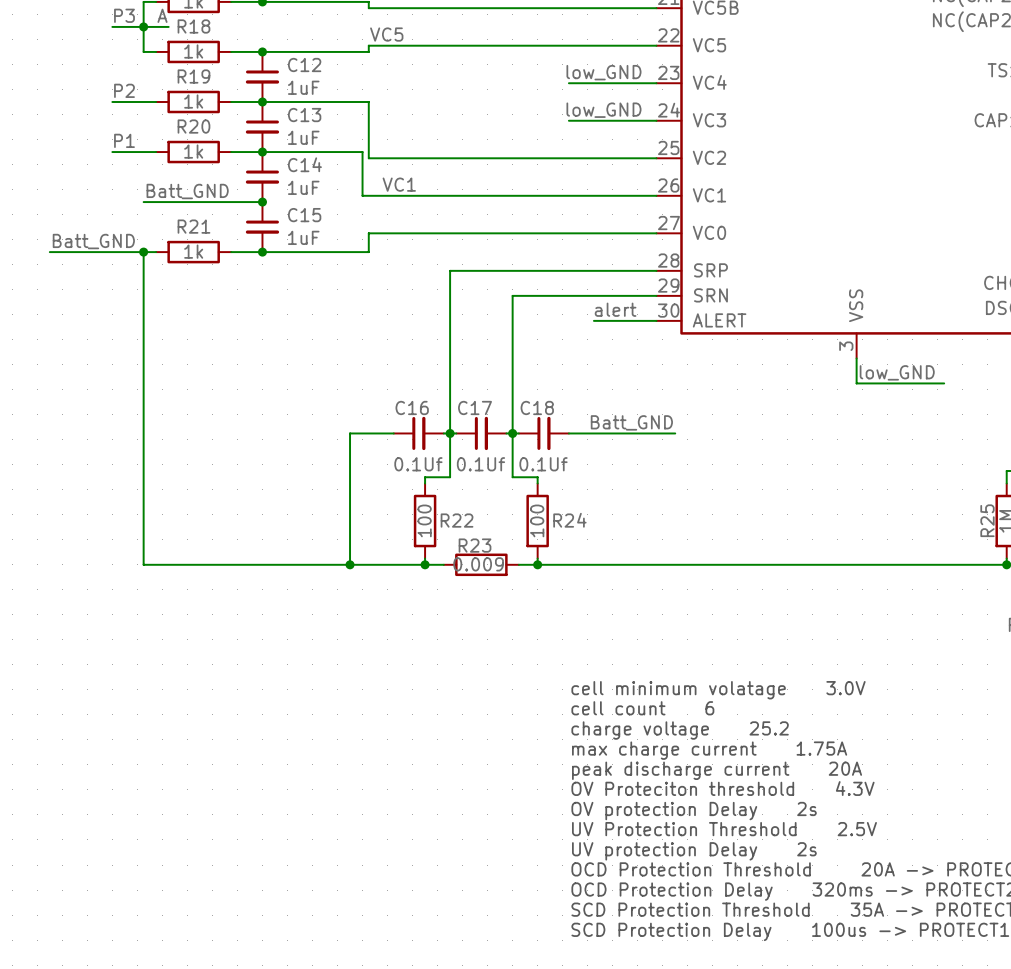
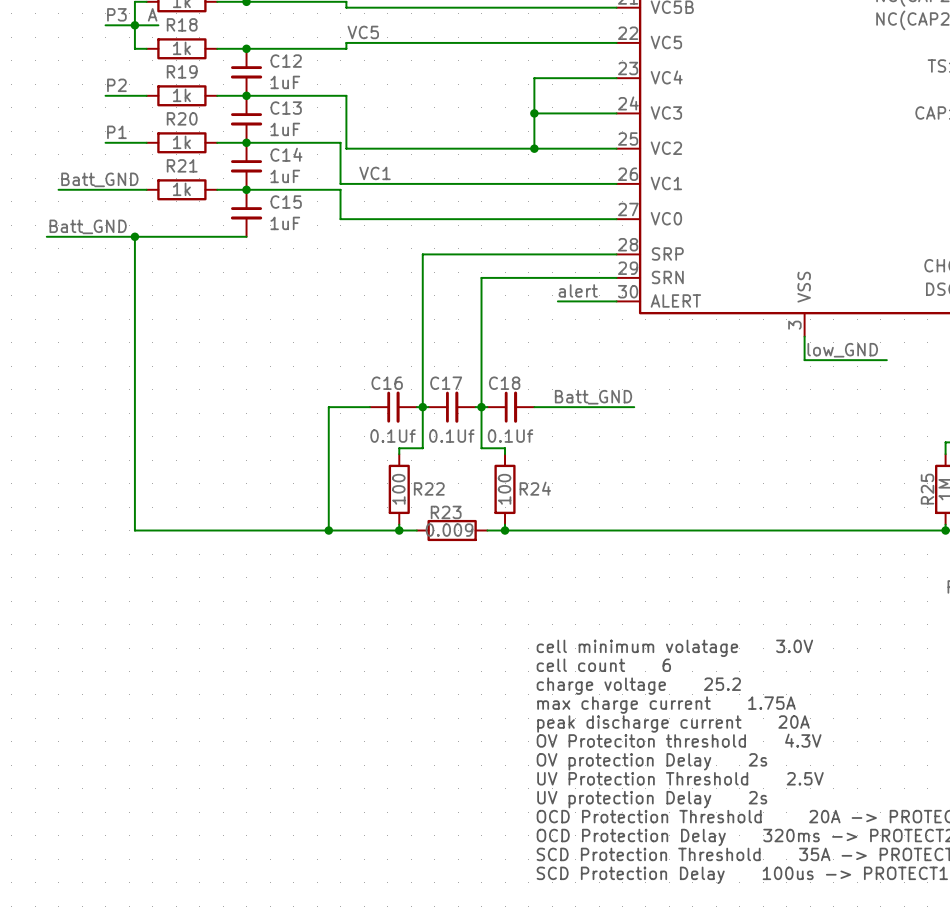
label: low_GND (603, 72) -> none
wire: none -> (534, 78) (534, 148)
label: low_GND (603, 110) -> none
junction: none -> (534, 113)
junction: none -> (534, 148)
label position: Batt_GND (187, 191) -> Batt_GND (99, 179)
wire: none -> (58, 189) (134, 189)
wire: (156, 202) (231, 202) -> (146, 236) (217, 236)
wire: (368, 233) (368, 252) (262, 252) -> (346, 219) (340, 219) (340, 189) (246, 189)
R21 position: (193, 252) -> (181, 189)
junction: (262, 252) -> none

